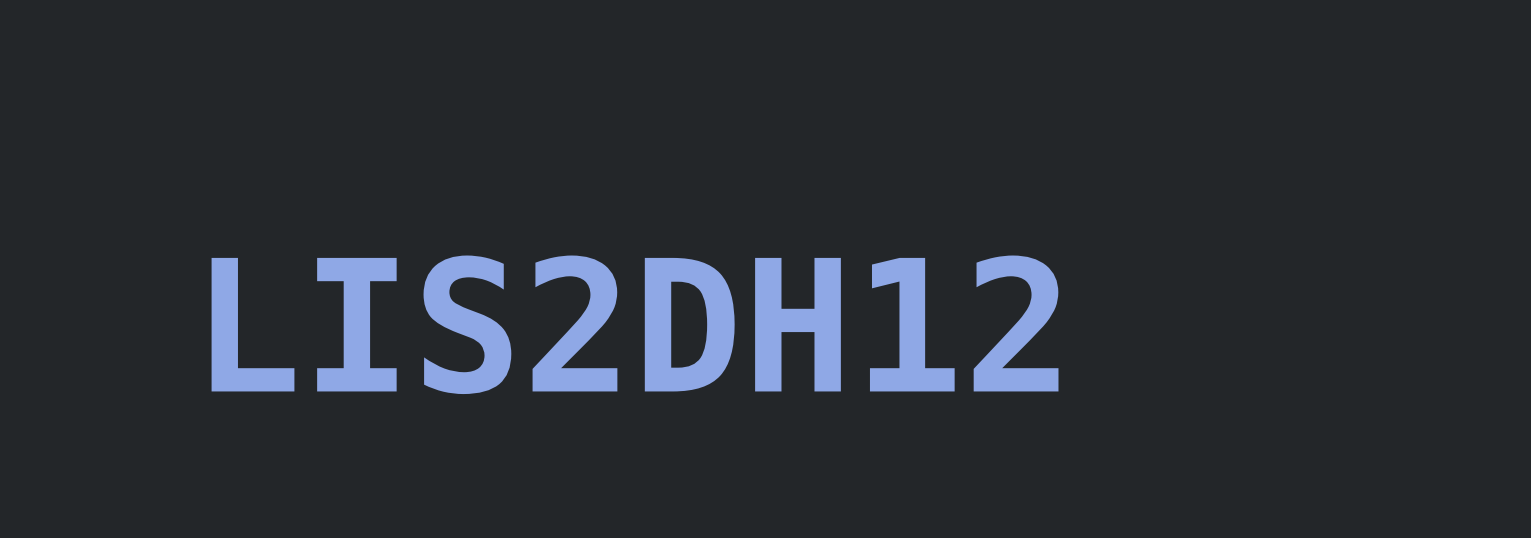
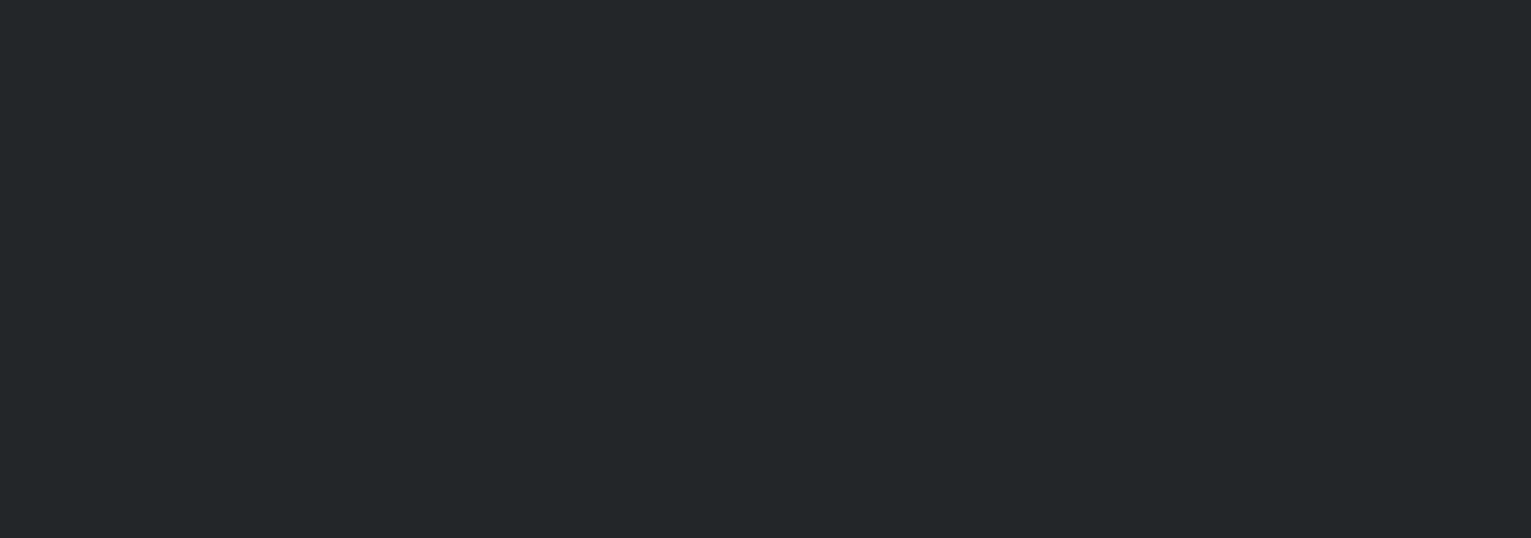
text: LIS2DH12 (635, 324) -> none

